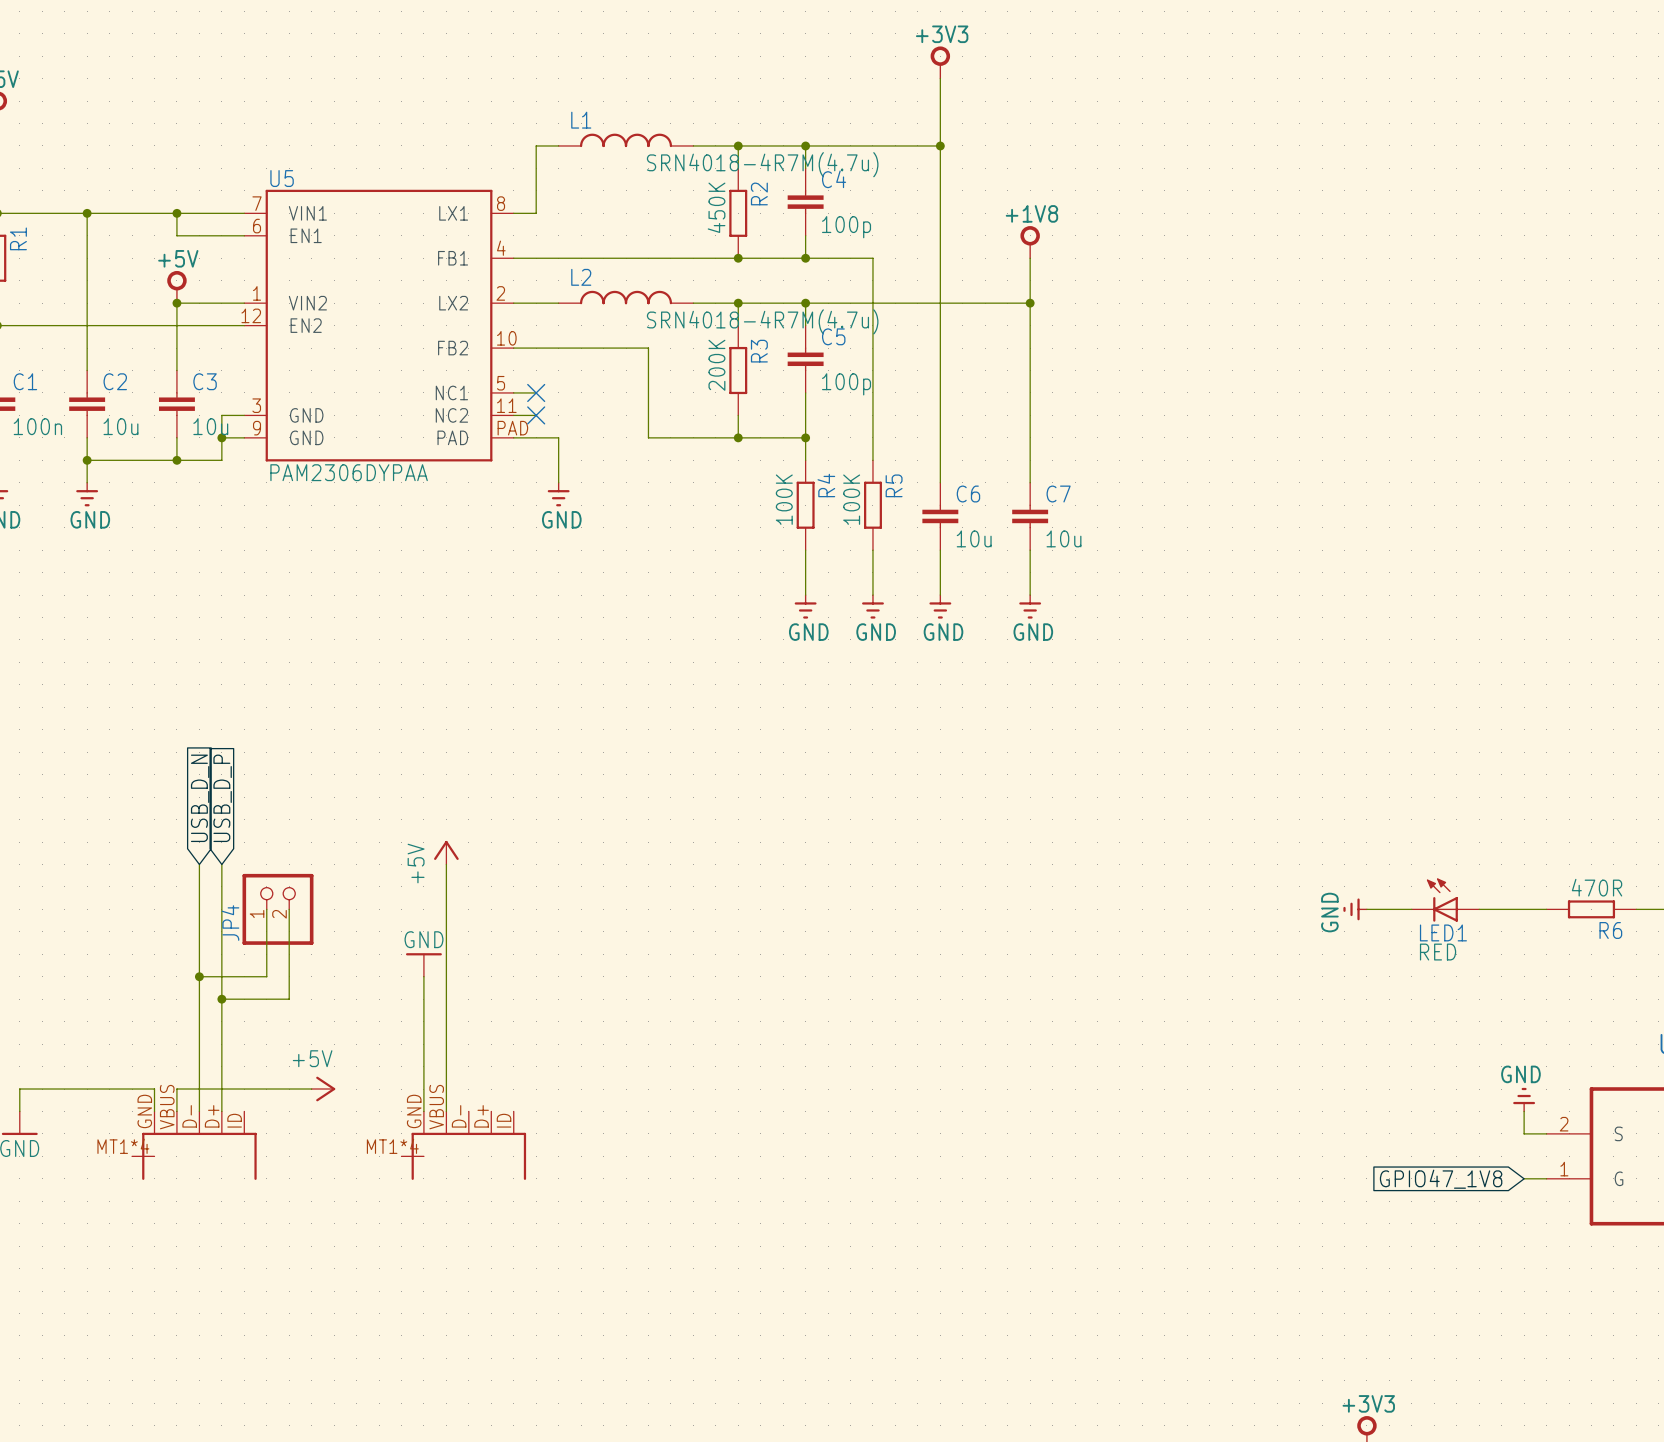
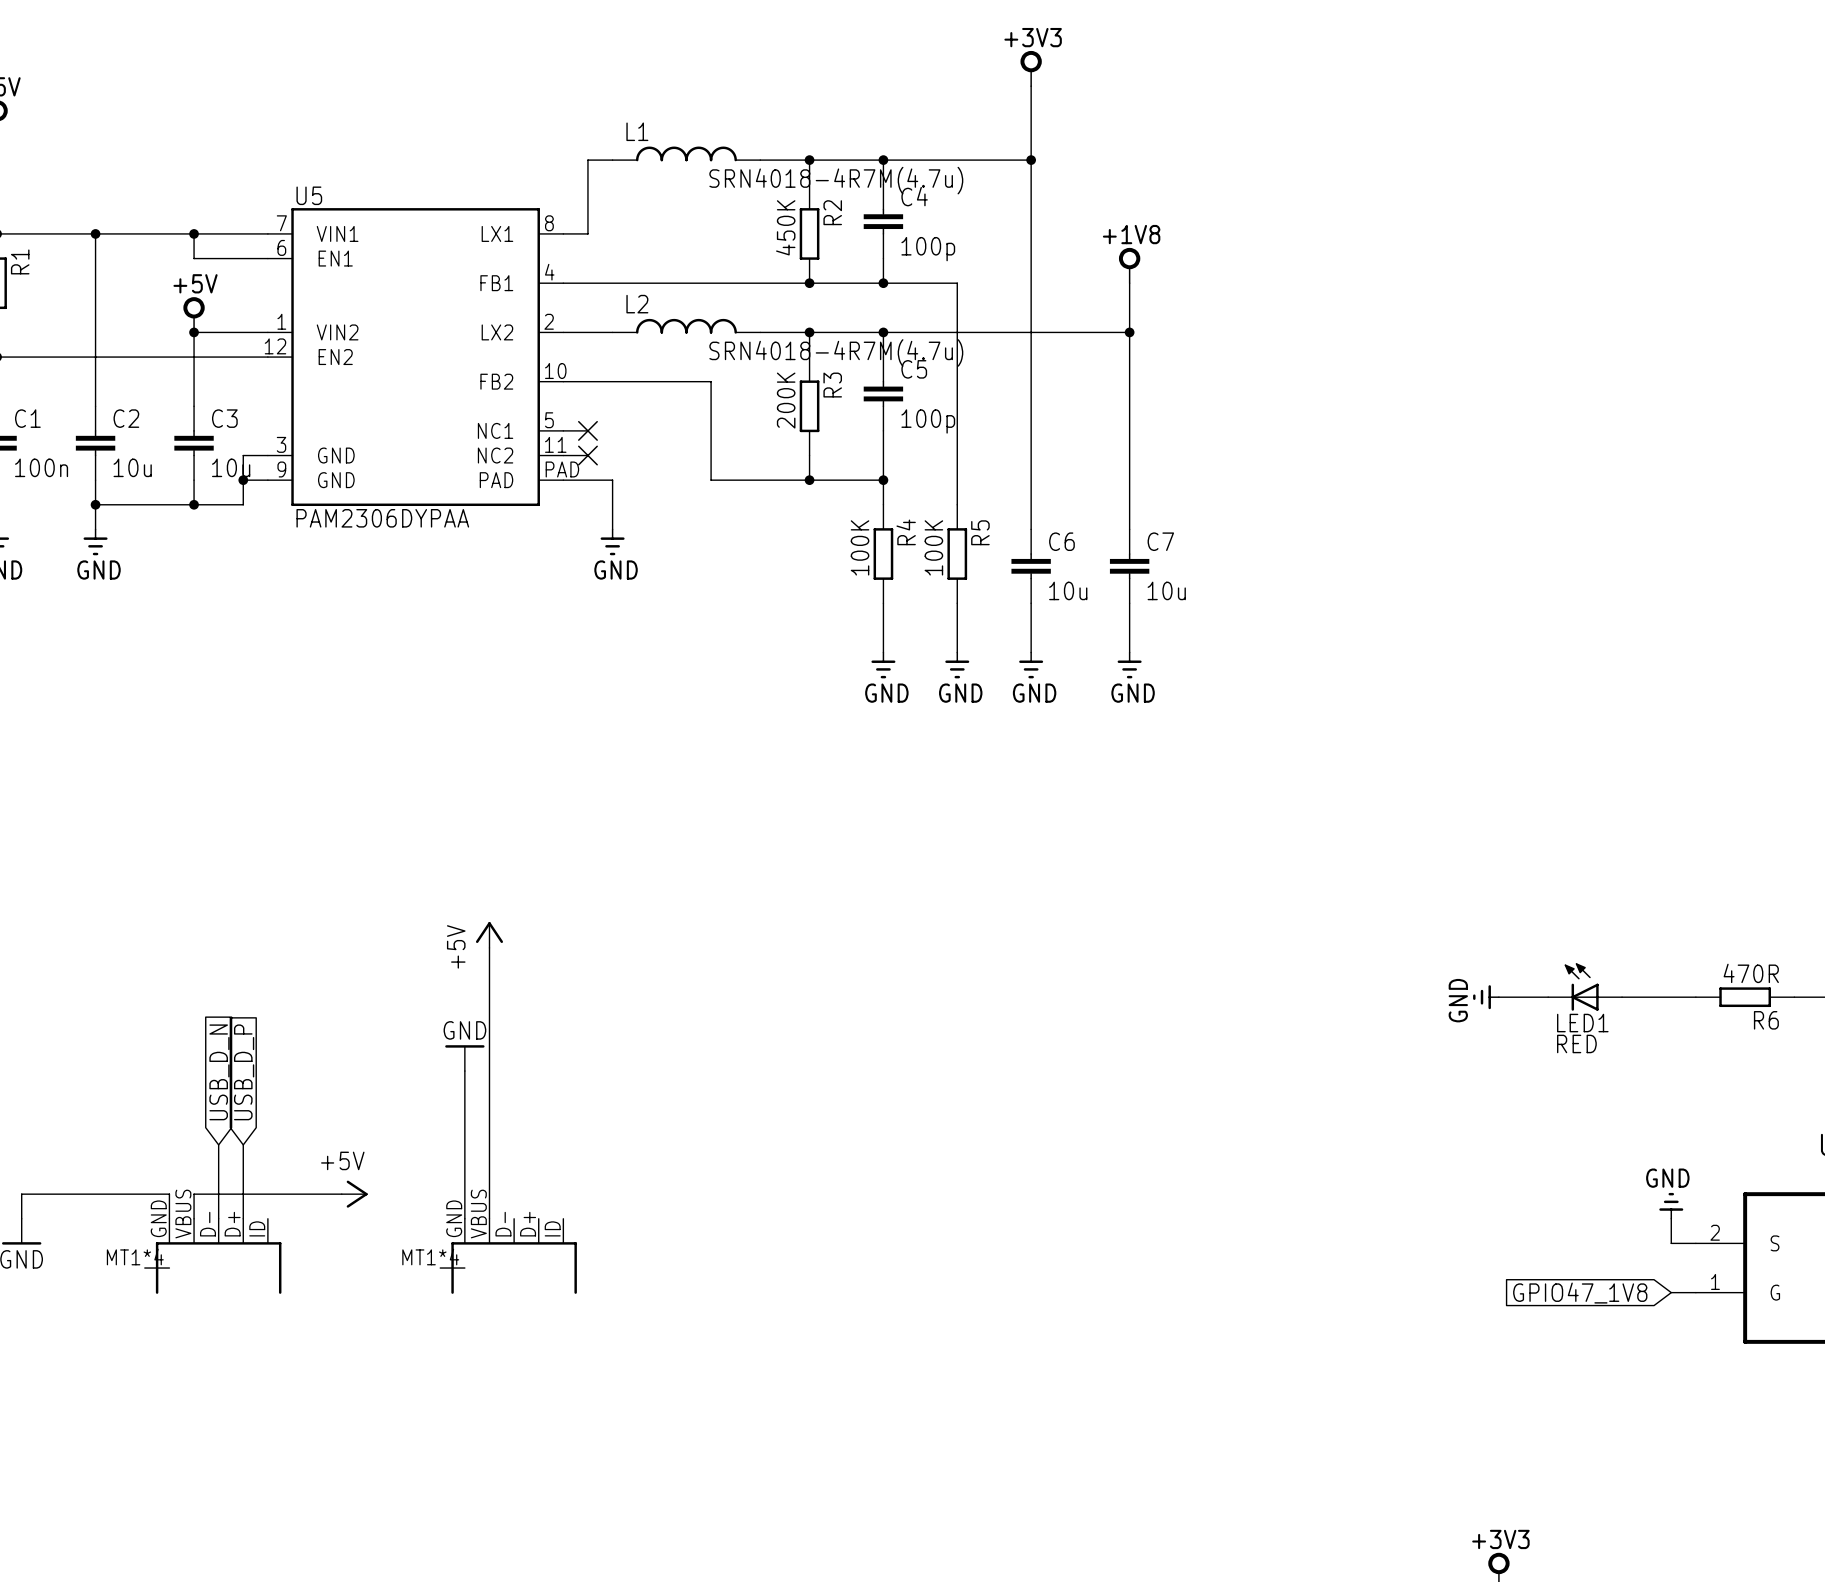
global label position: USB_D_N (200, 798) -> USB_D_N (219, 1072)
global label position: USB_D_P (222, 798) -> USB_D_P (244, 1072)
wire: (199, 864) (199, 1044) -> none
wire: (221, 864) (221, 1044) -> none
wire: (266, 909) (266, 976) (199, 976) -> none
JP4: (277, 909) -> none
wire: (289, 909) (289, 999) (221, 999) -> none
junction: (199, 976) -> none
junction: (221, 999) -> none

